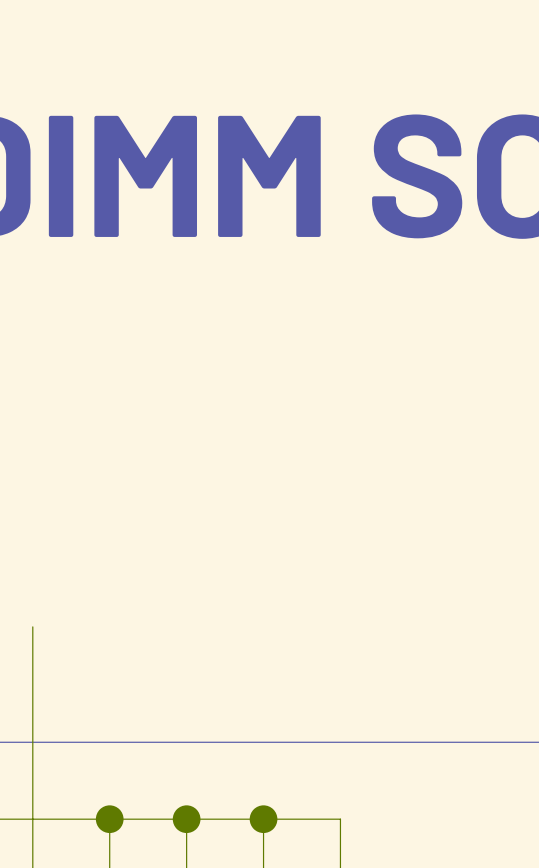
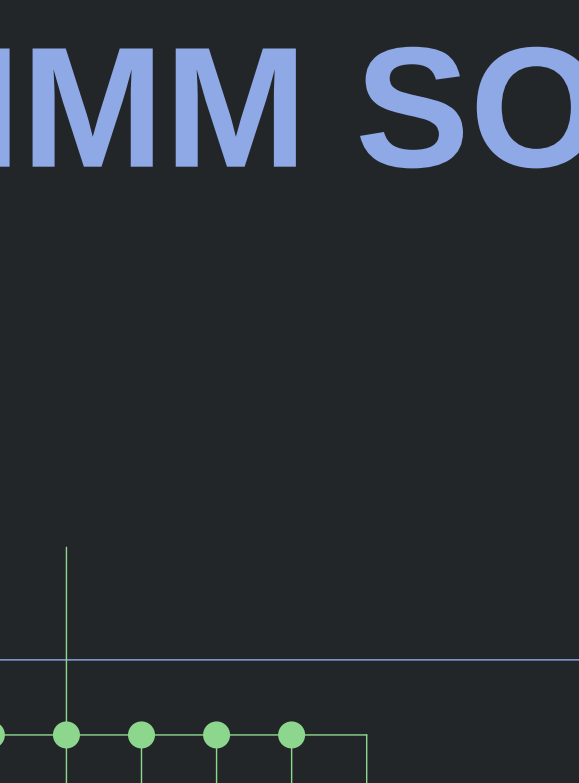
junction: none -> (66, 734)

